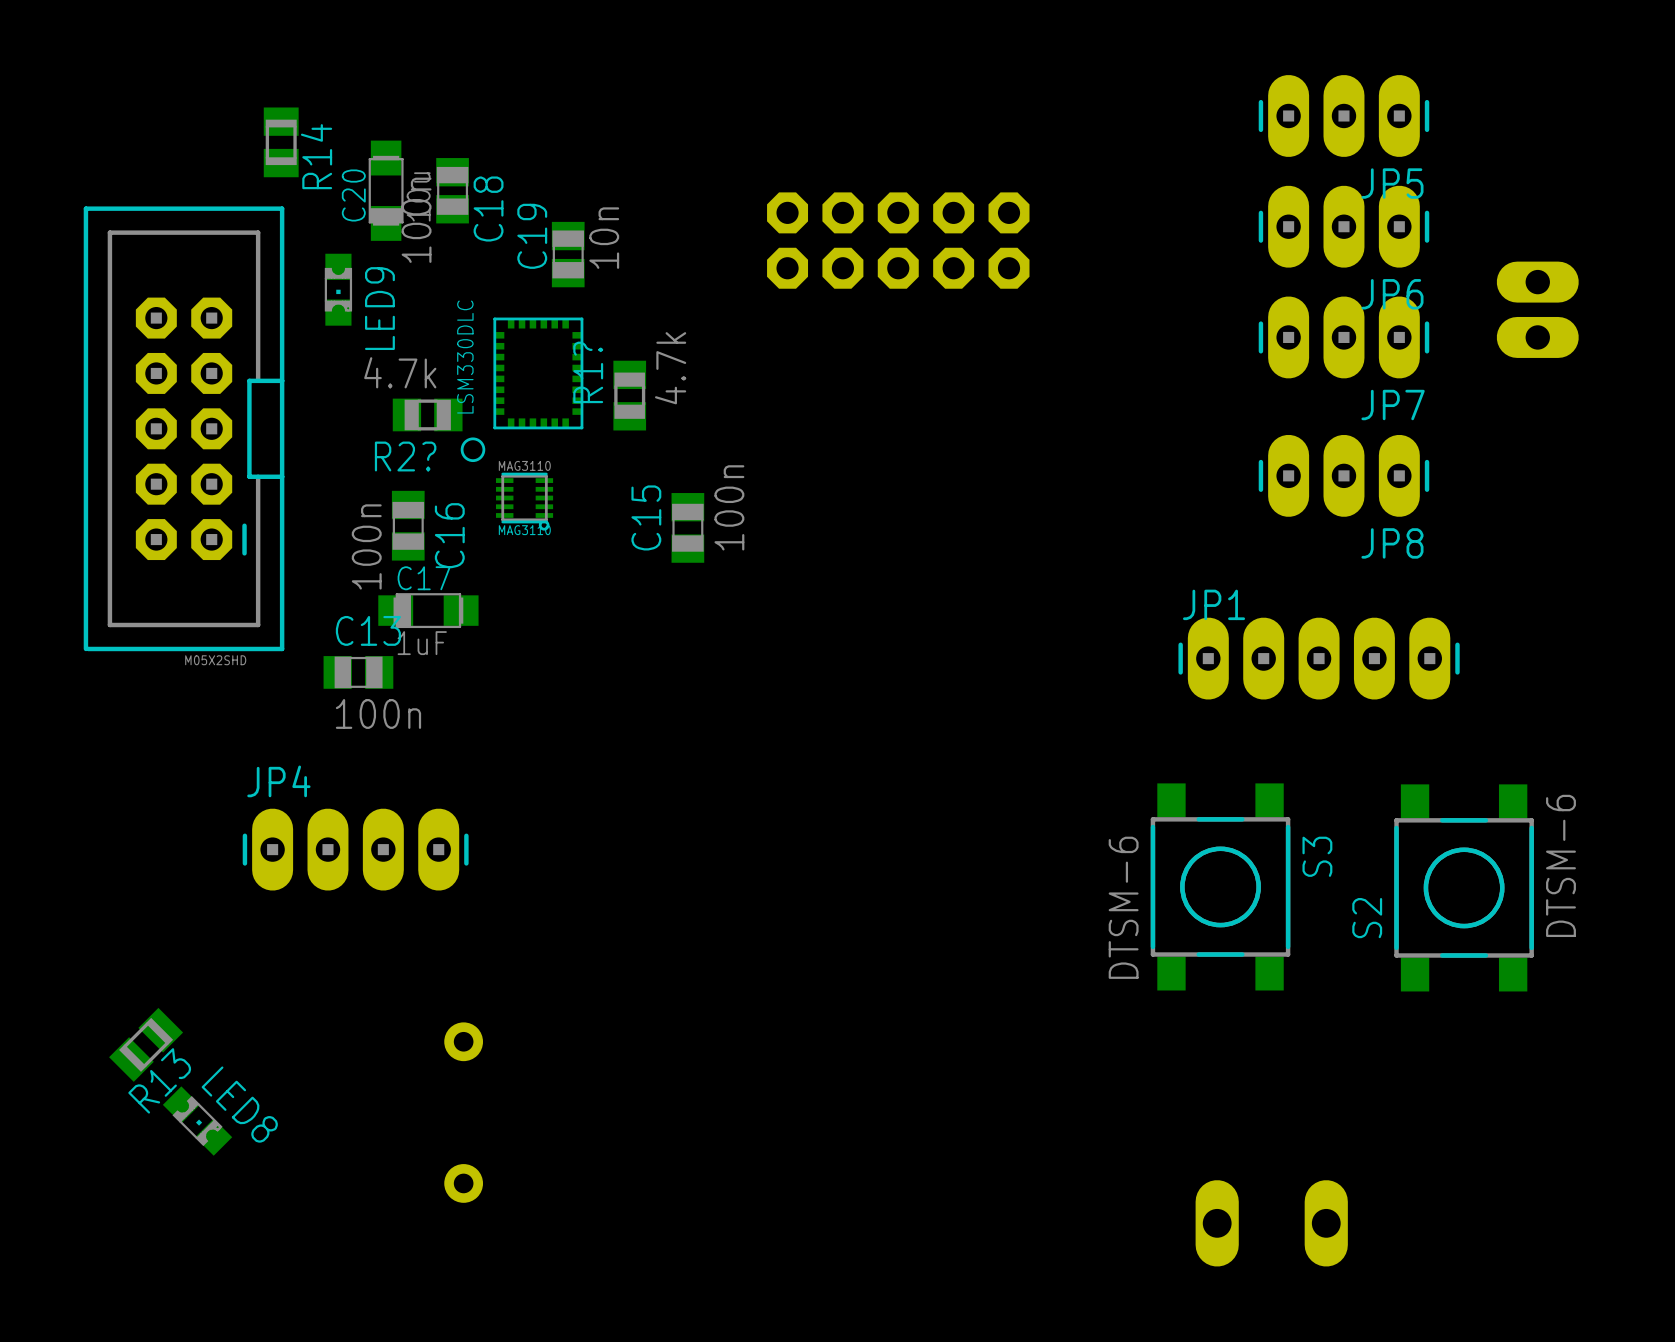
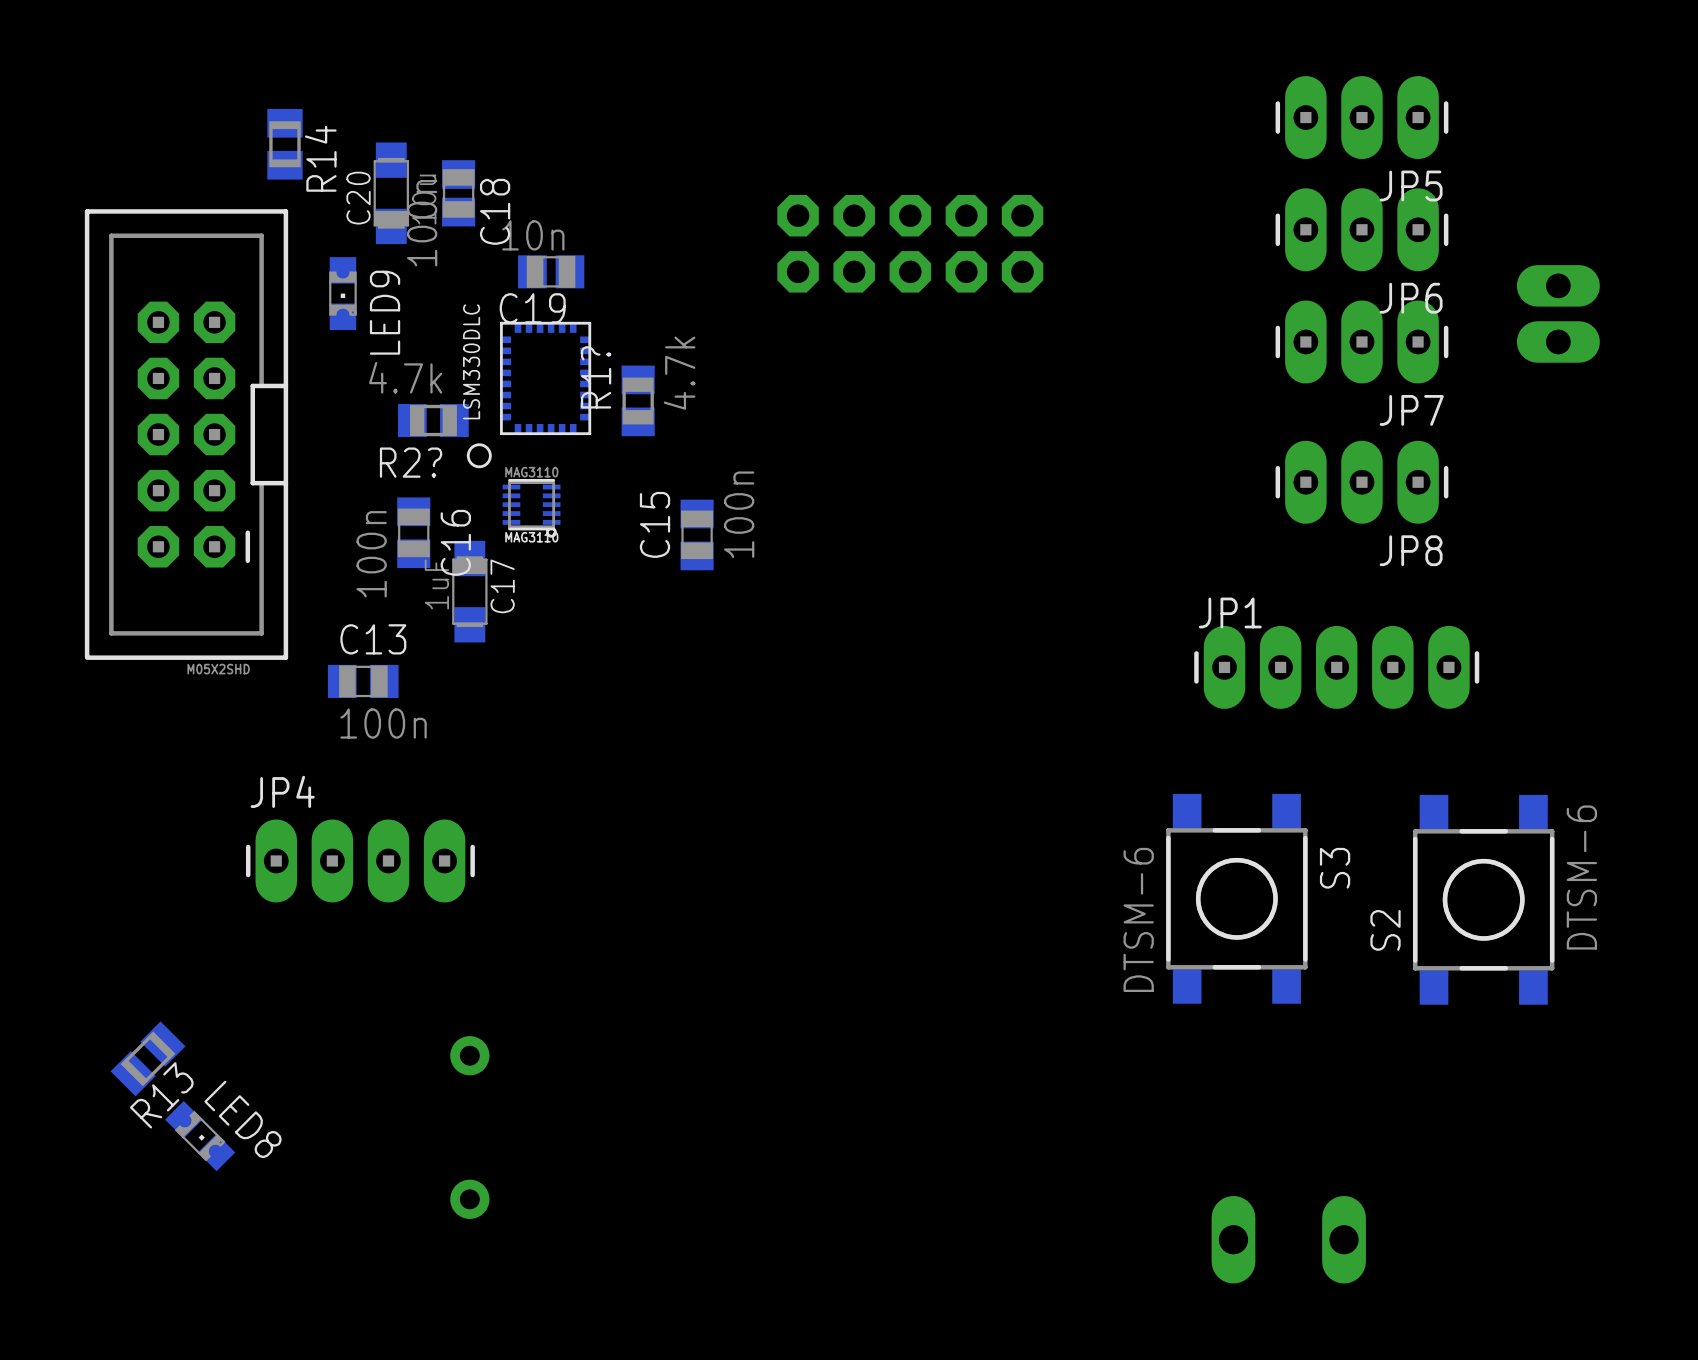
C19 name position: C19 (532, 236) -> C19 (532, 308)
C19 value position: 10n (604, 238) -> 10n (533, 235)
C19 rotation: 0° (568, 254) -> 90° clockwise (551, 271)
C17 rotation: 0° (428, 610) -> 90° clockwise (469, 591)

